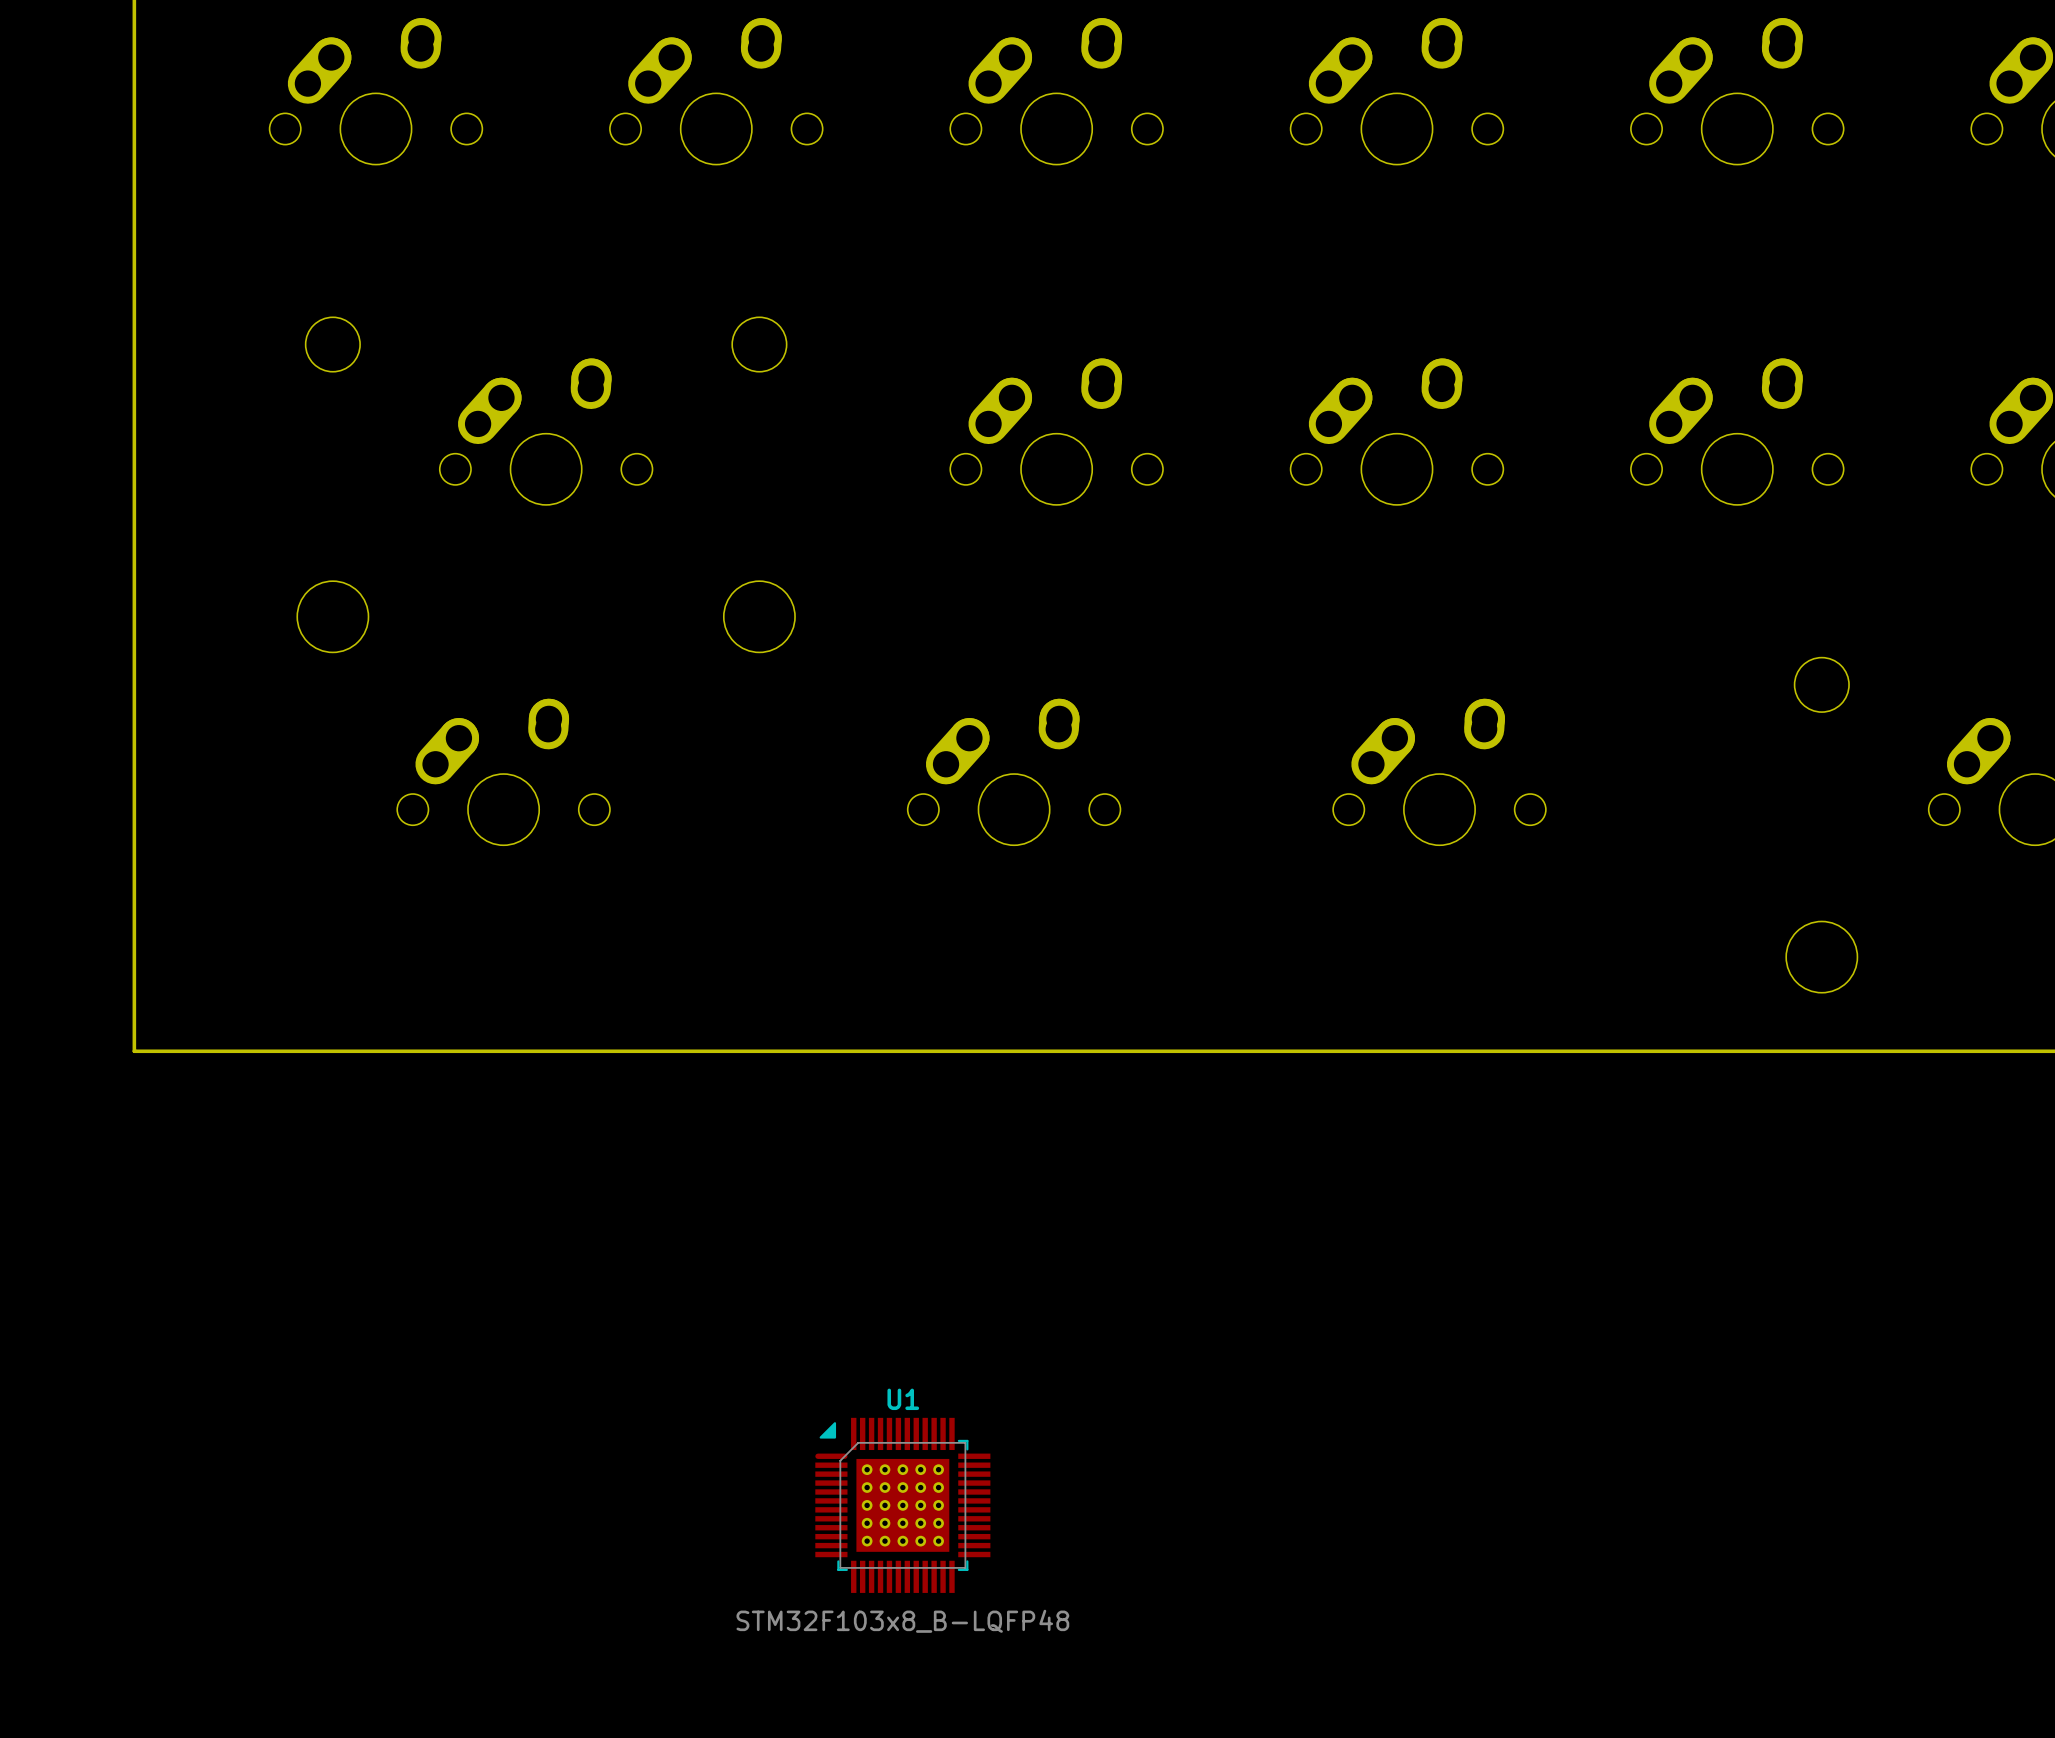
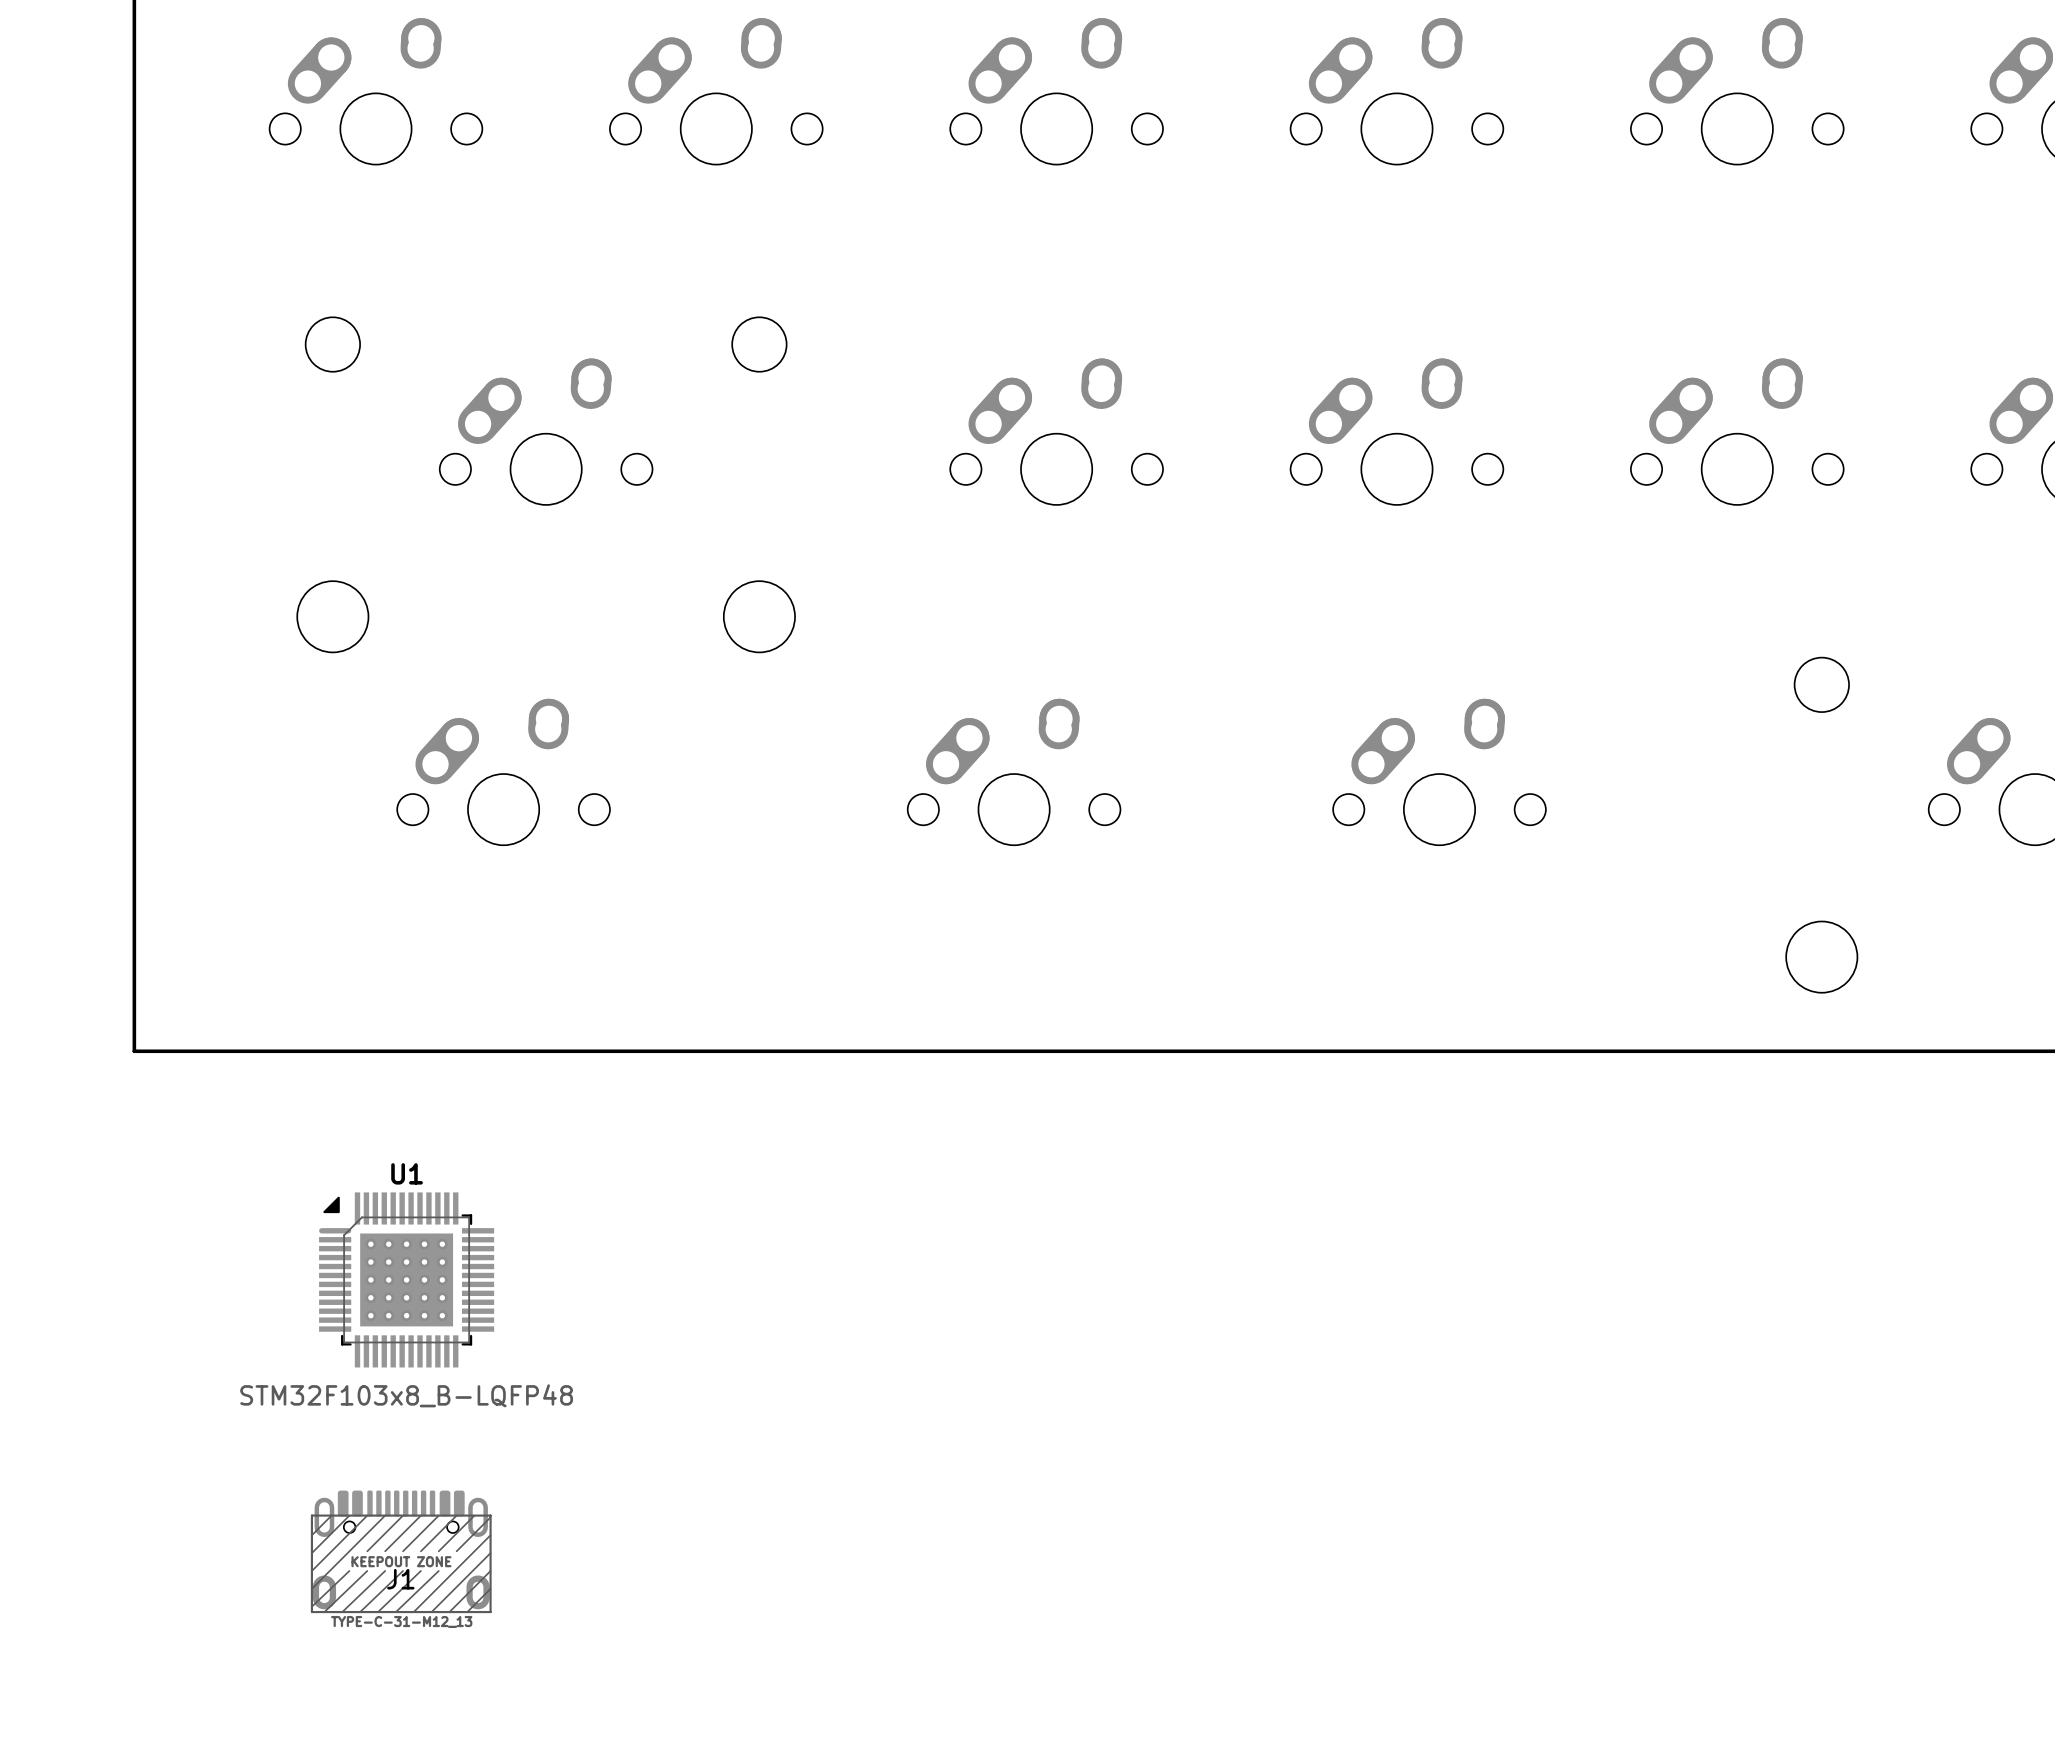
U1 position: (902, 1505) -> (406, 1279)
J1: none -> TYPE-C-31-M12_13 (401, 1551)

